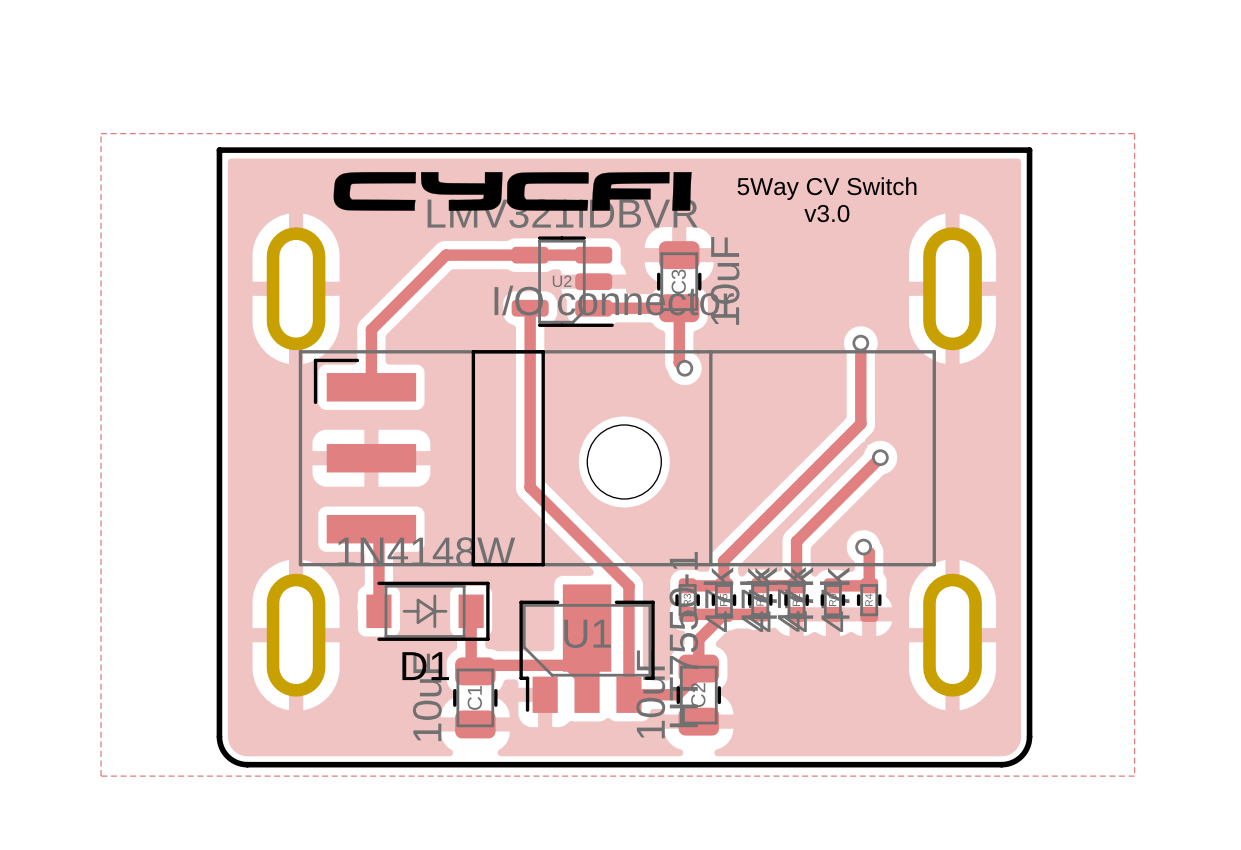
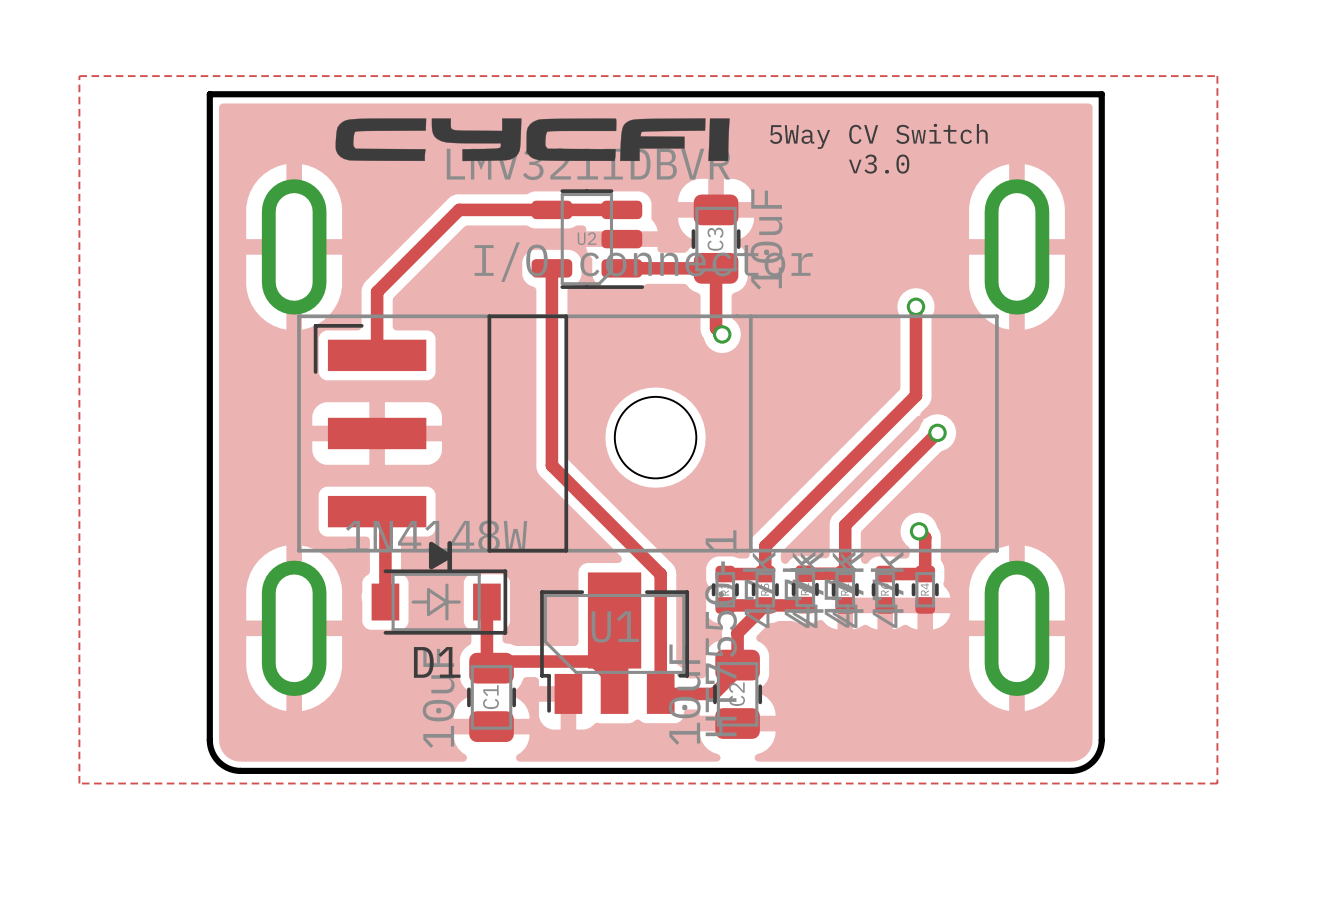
drawing: none -> [428, 541, 453, 570]
line: none -> (449, 543) (449, 569)

